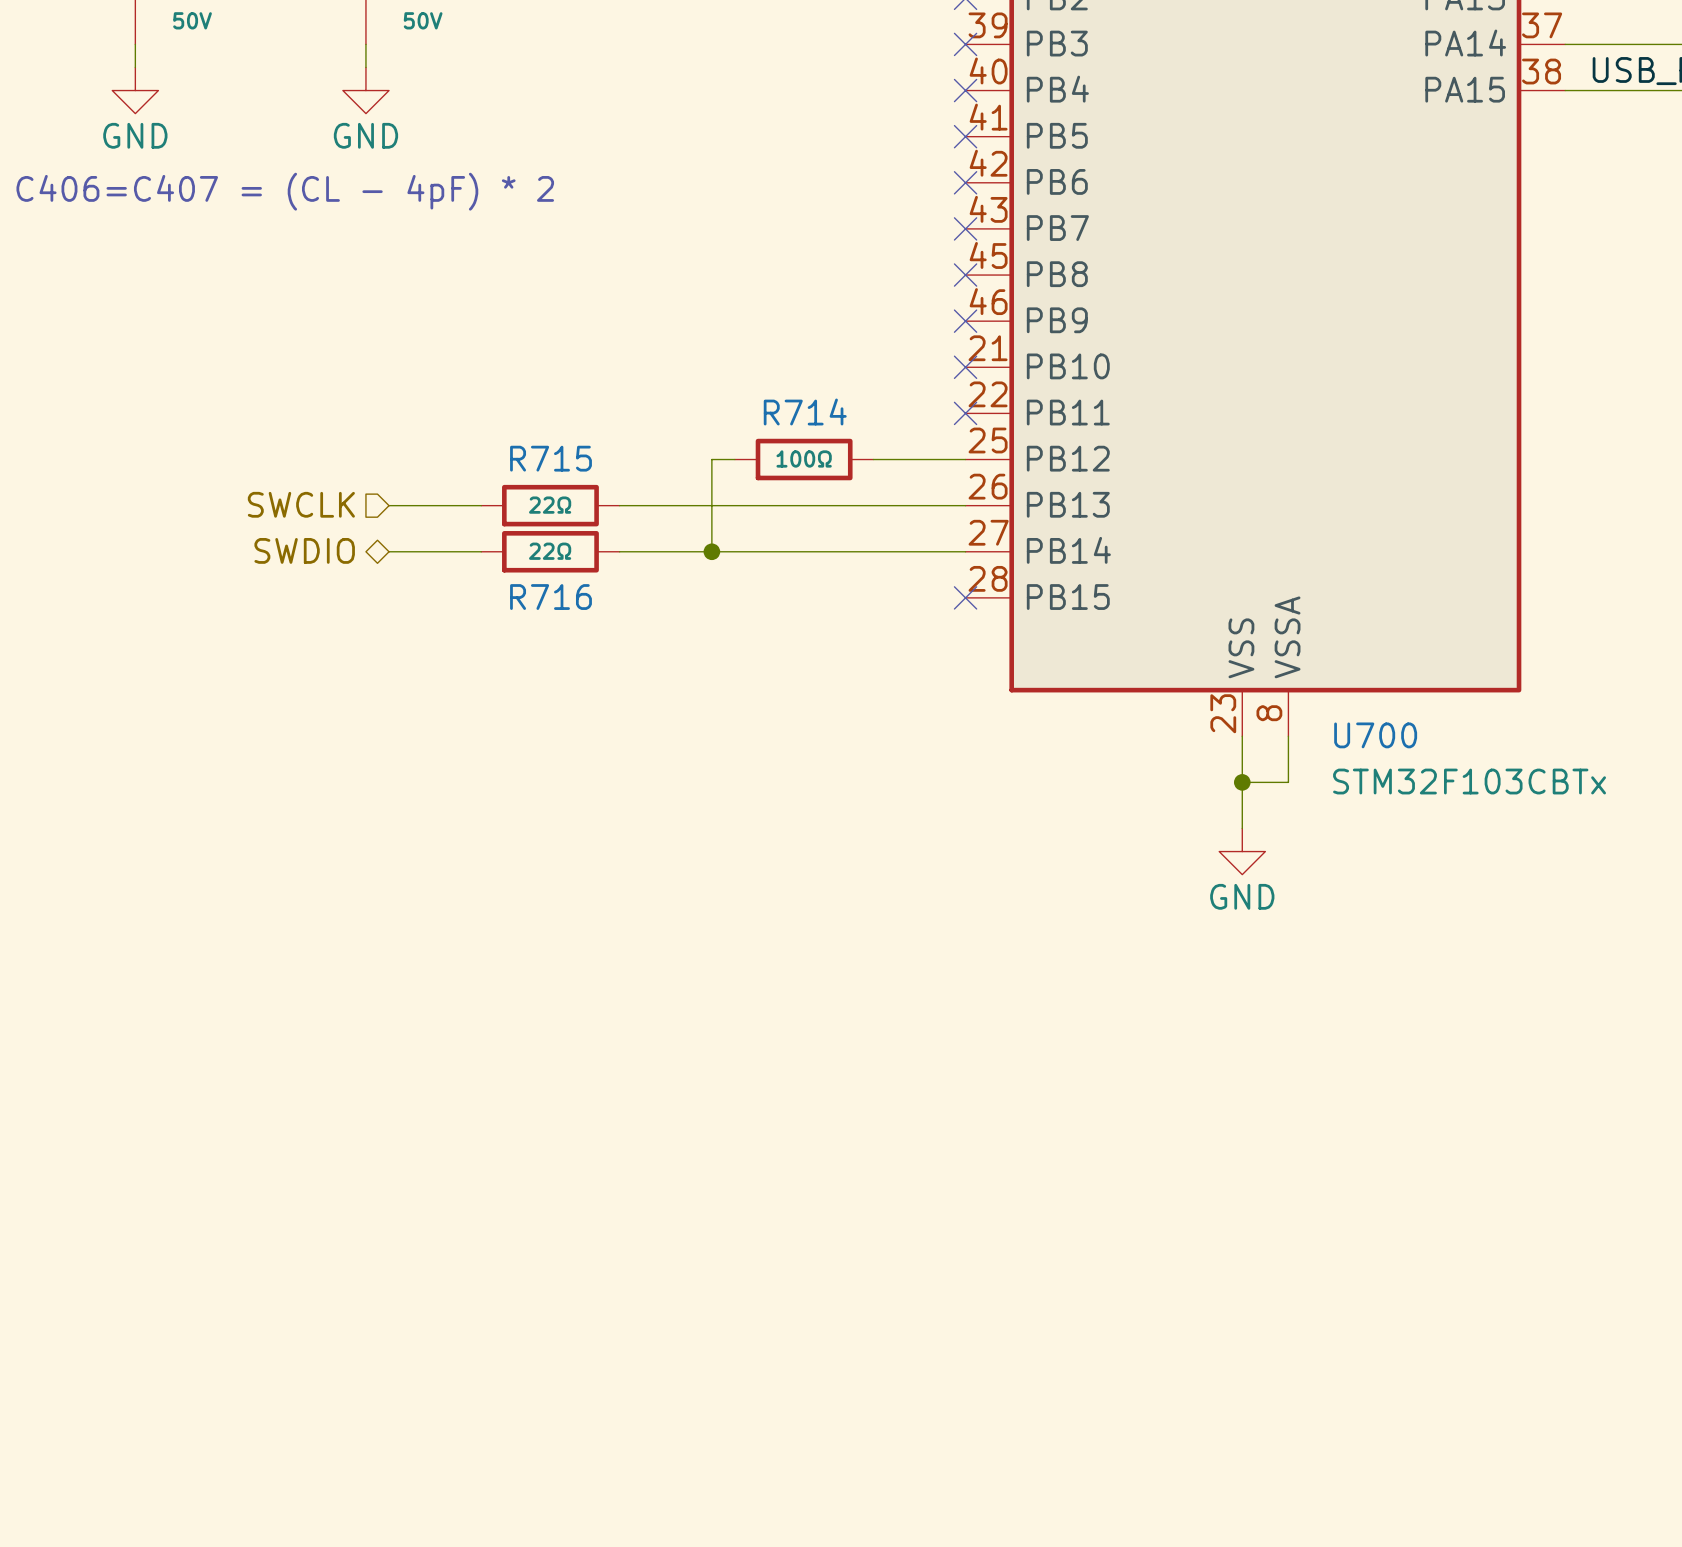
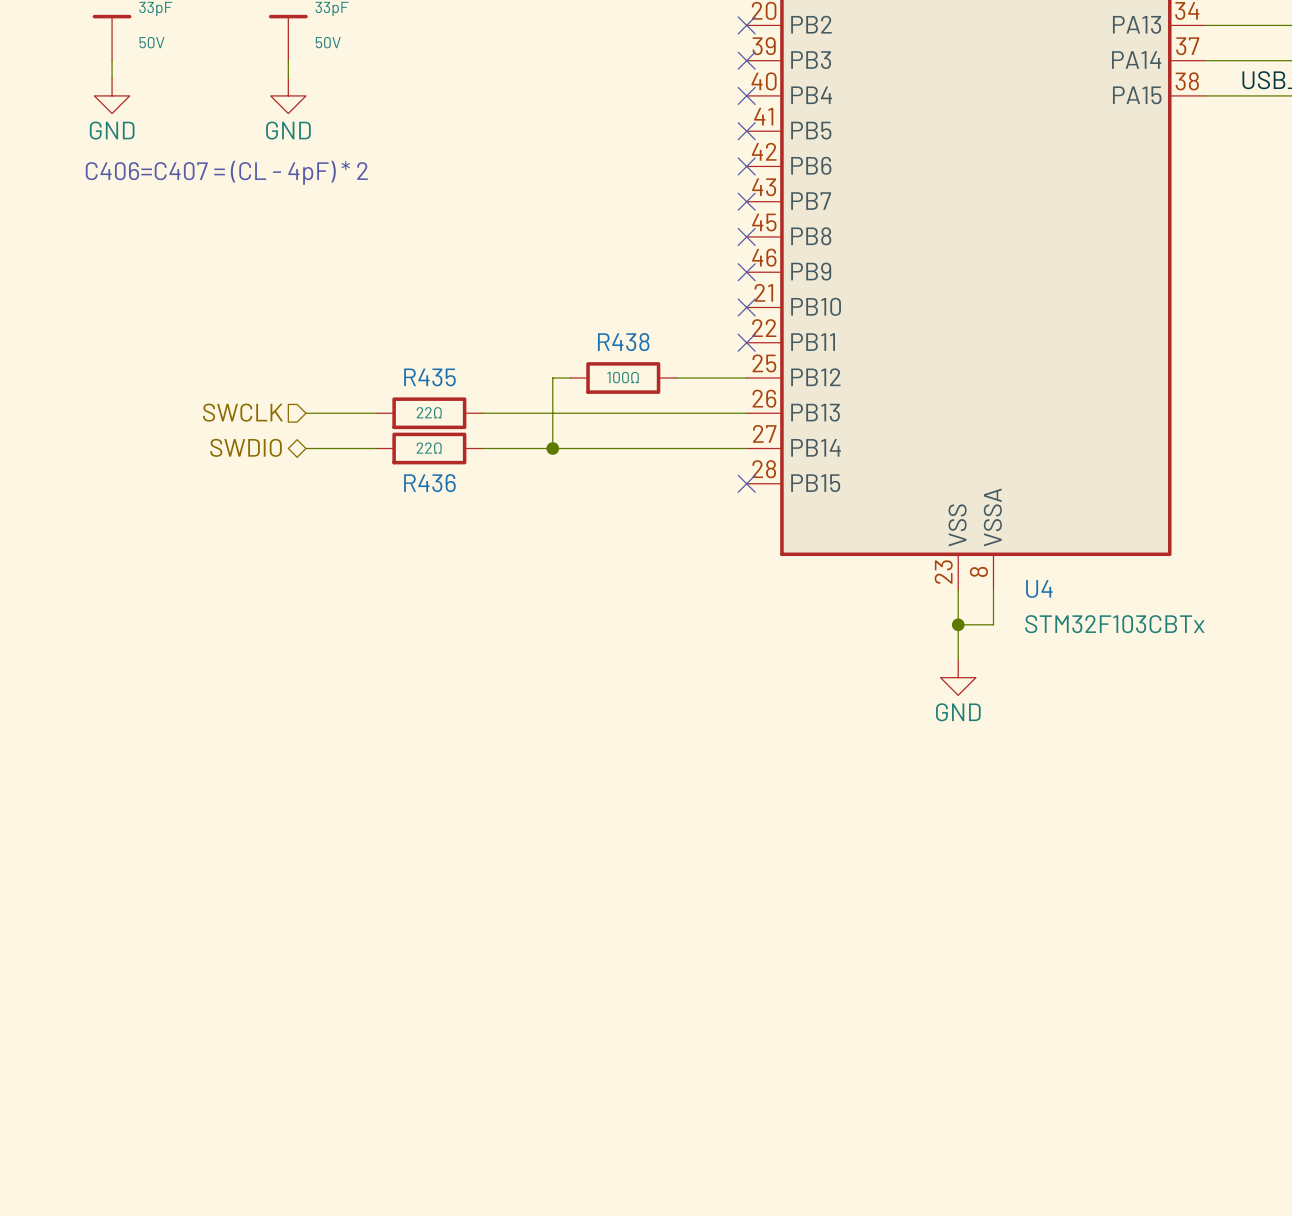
R714 name: R714 (805, 411) -> R438 (623, 342)
R715 name: R715 (551, 458) -> R435 (429, 377)
R716 name: R716 (551, 597) -> R436 (429, 483)
U700 name: U700 (1375, 735) -> U4 (1039, 588)

